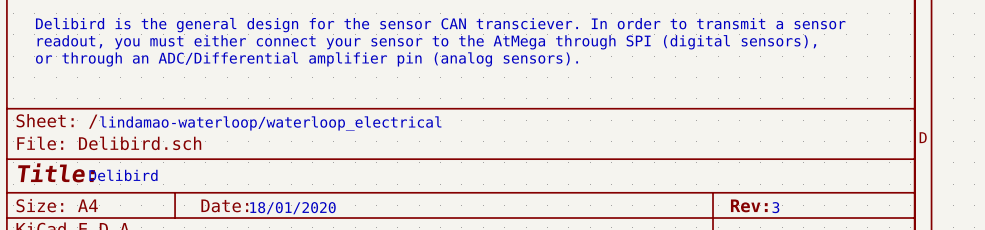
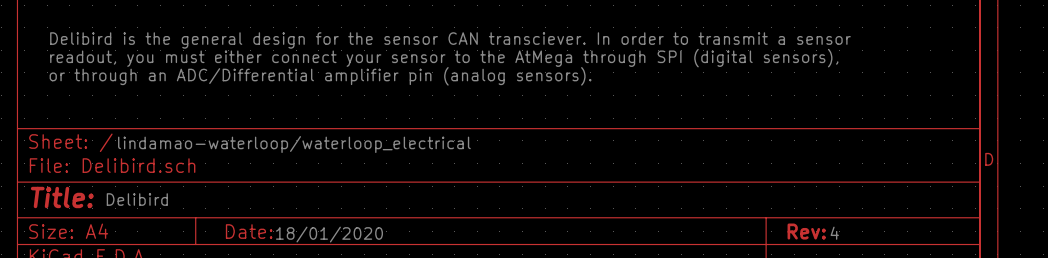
text: 3 (775, 207) -> 4 (834, 233)

